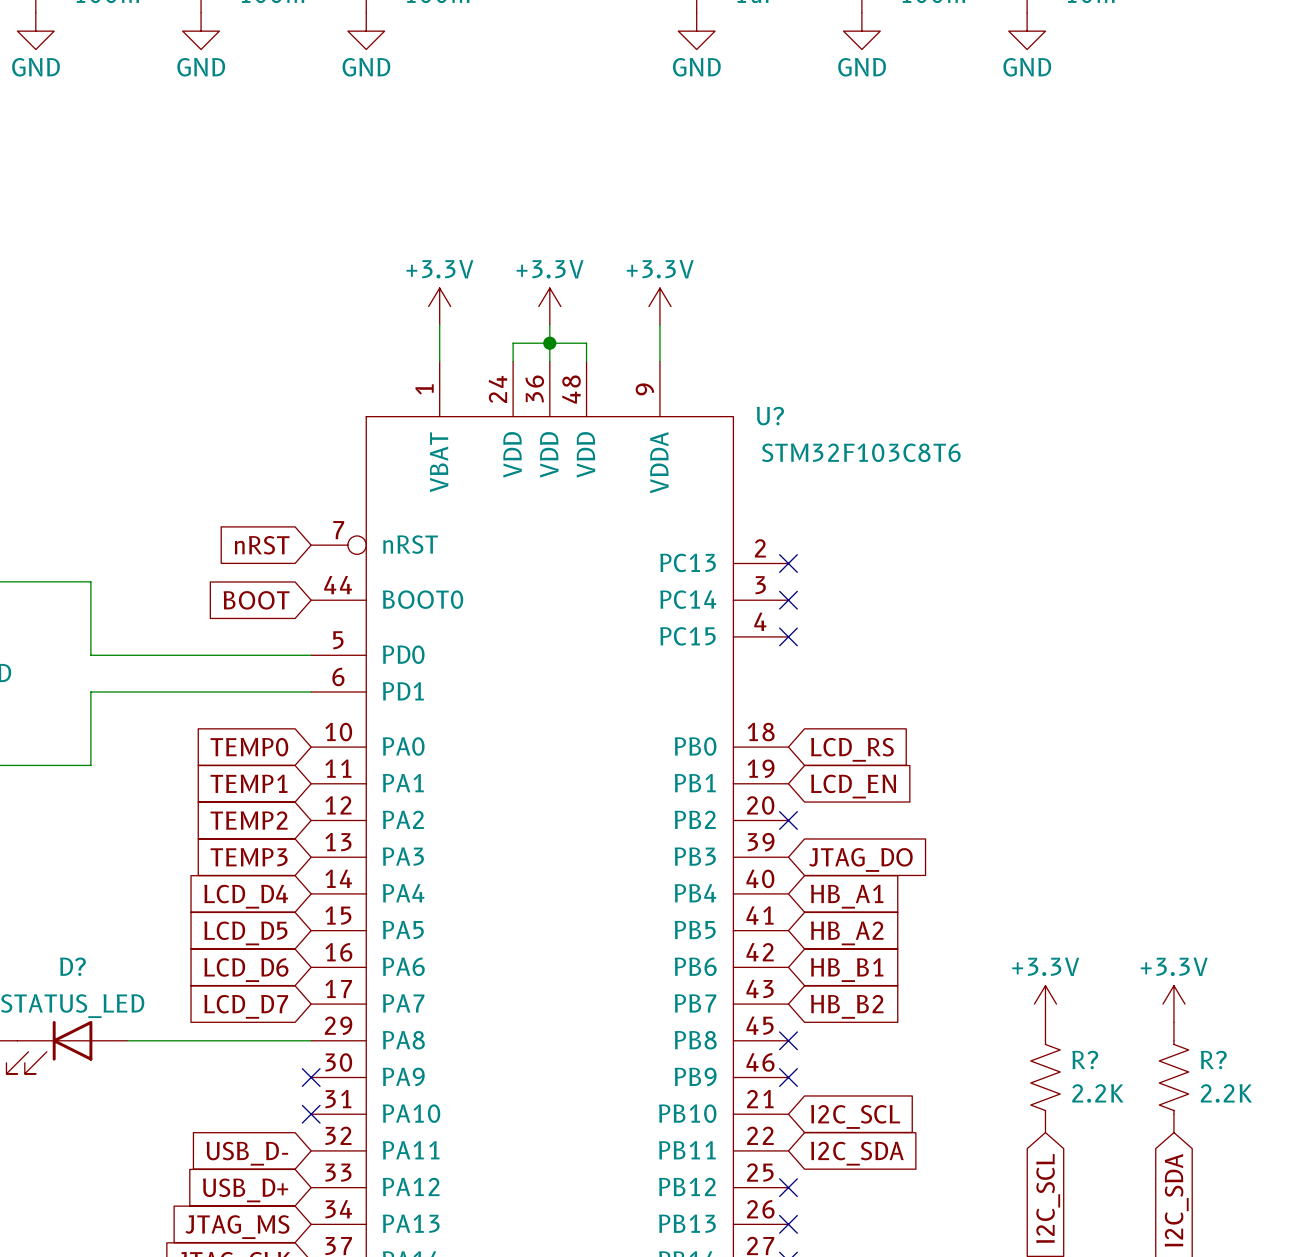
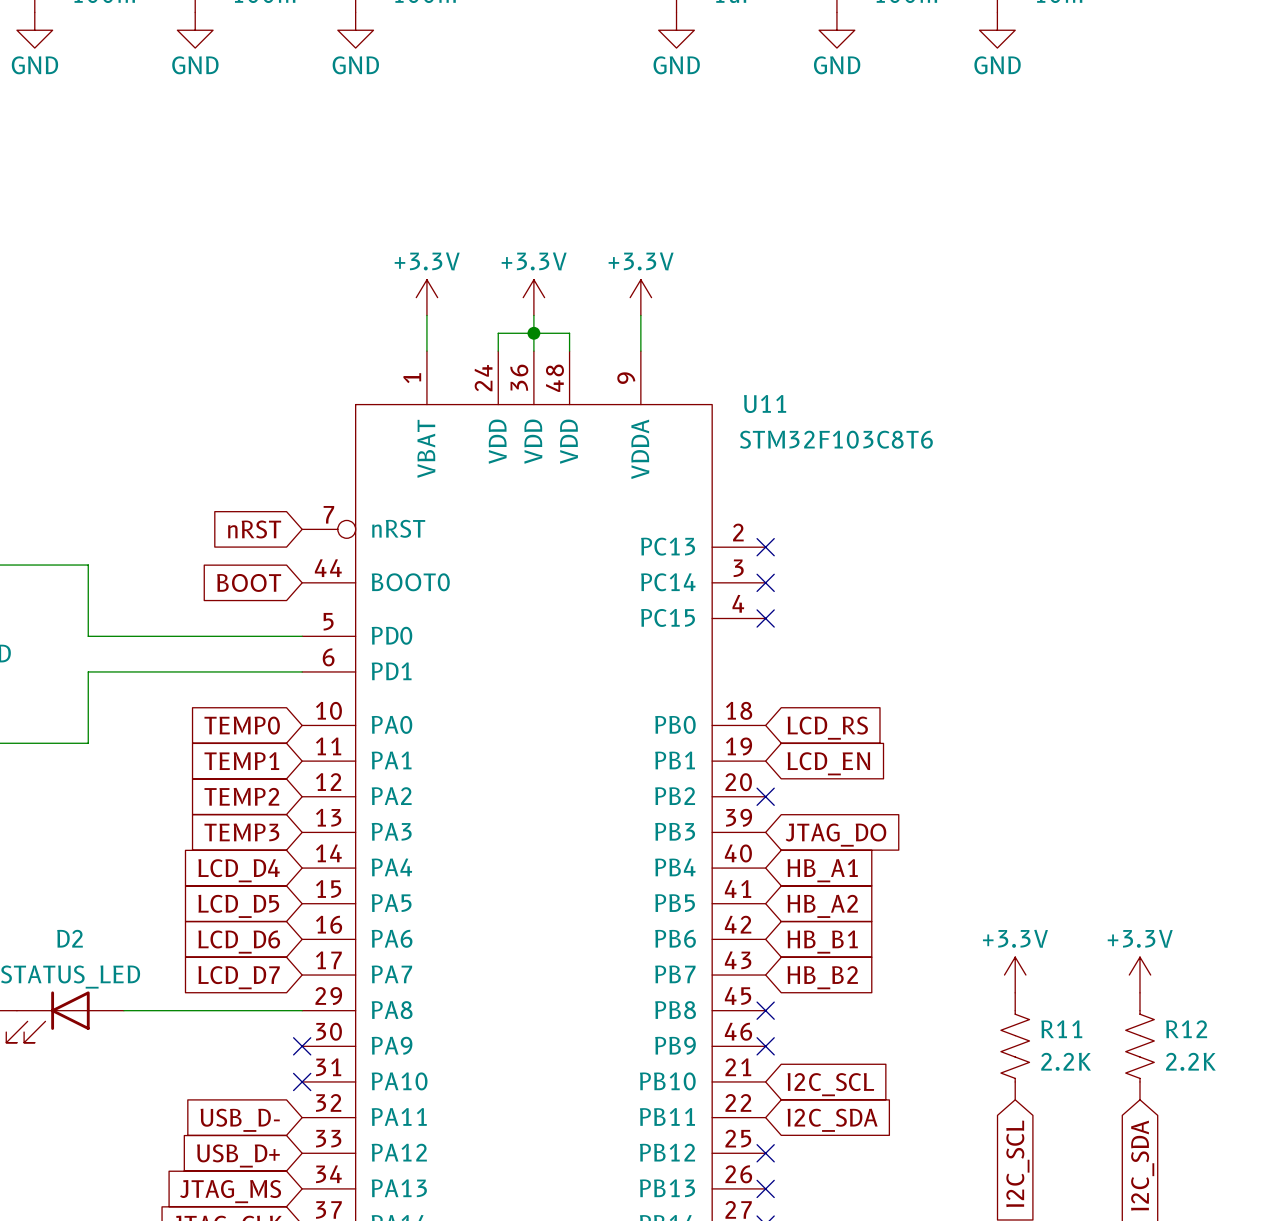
U? name: U? (770, 416) -> U11 (765, 404)
D? name: D? (72, 966) -> D2 (70, 938)
R? name: R? (1085, 1060) -> R11 (1061, 1029)
R? name: R? (1213, 1060) -> R12 (1186, 1029)

